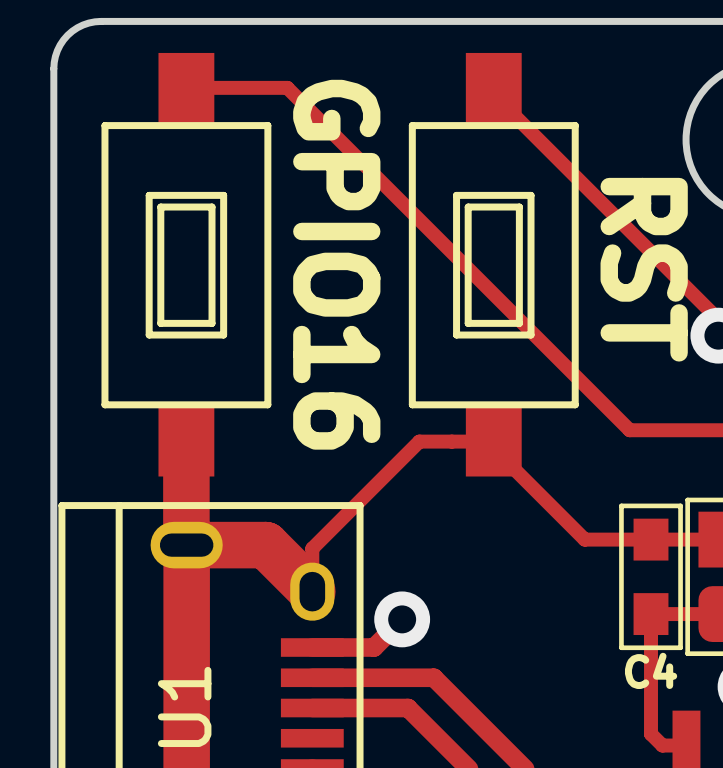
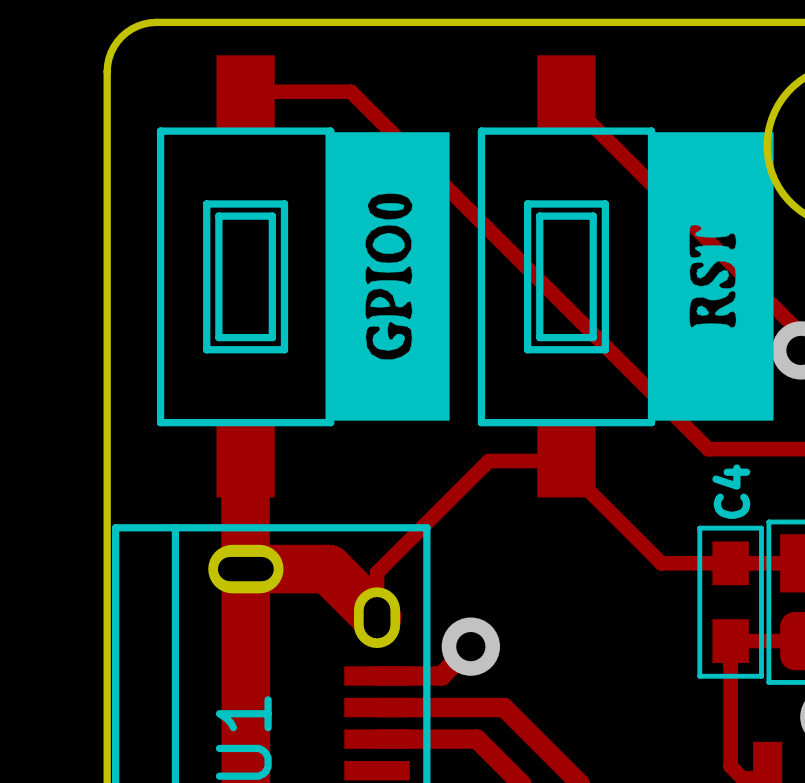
drawing: none -> [325, 132, 450, 421]
drawing: none -> [649, 132, 774, 421]
text: GPIO16 (336, 264) -> none
text: RST (644, 269) -> none
C4 name rotation: 0° (651, 670) -> 90° counterclockwise (731, 491)
C4 name position: C4 (651, 670) -> C4 (731, 491)

